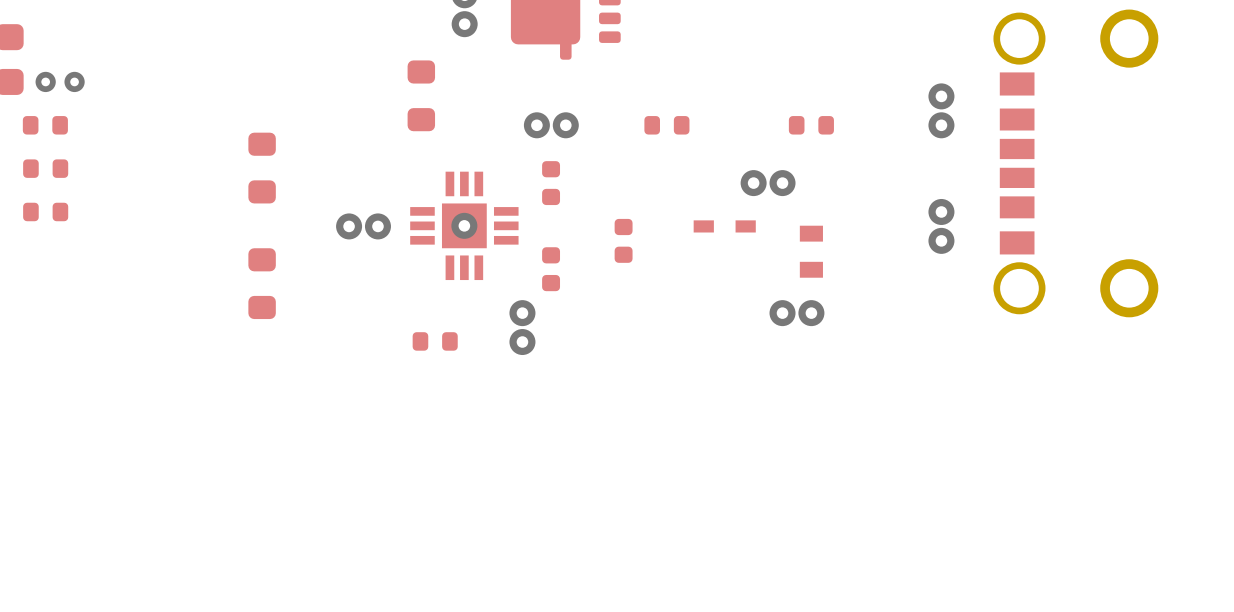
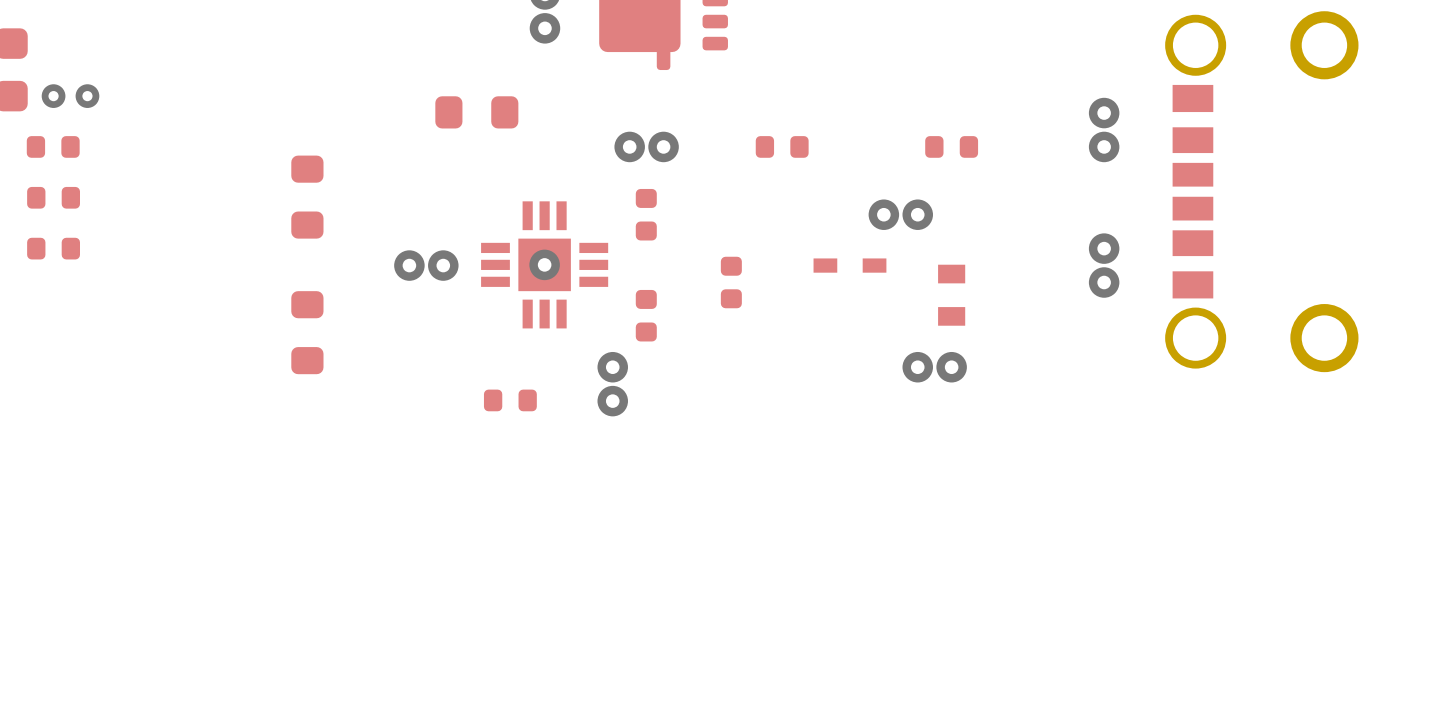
part rotation: 0° (421, 95) -> 90° clockwise (476, 112)

